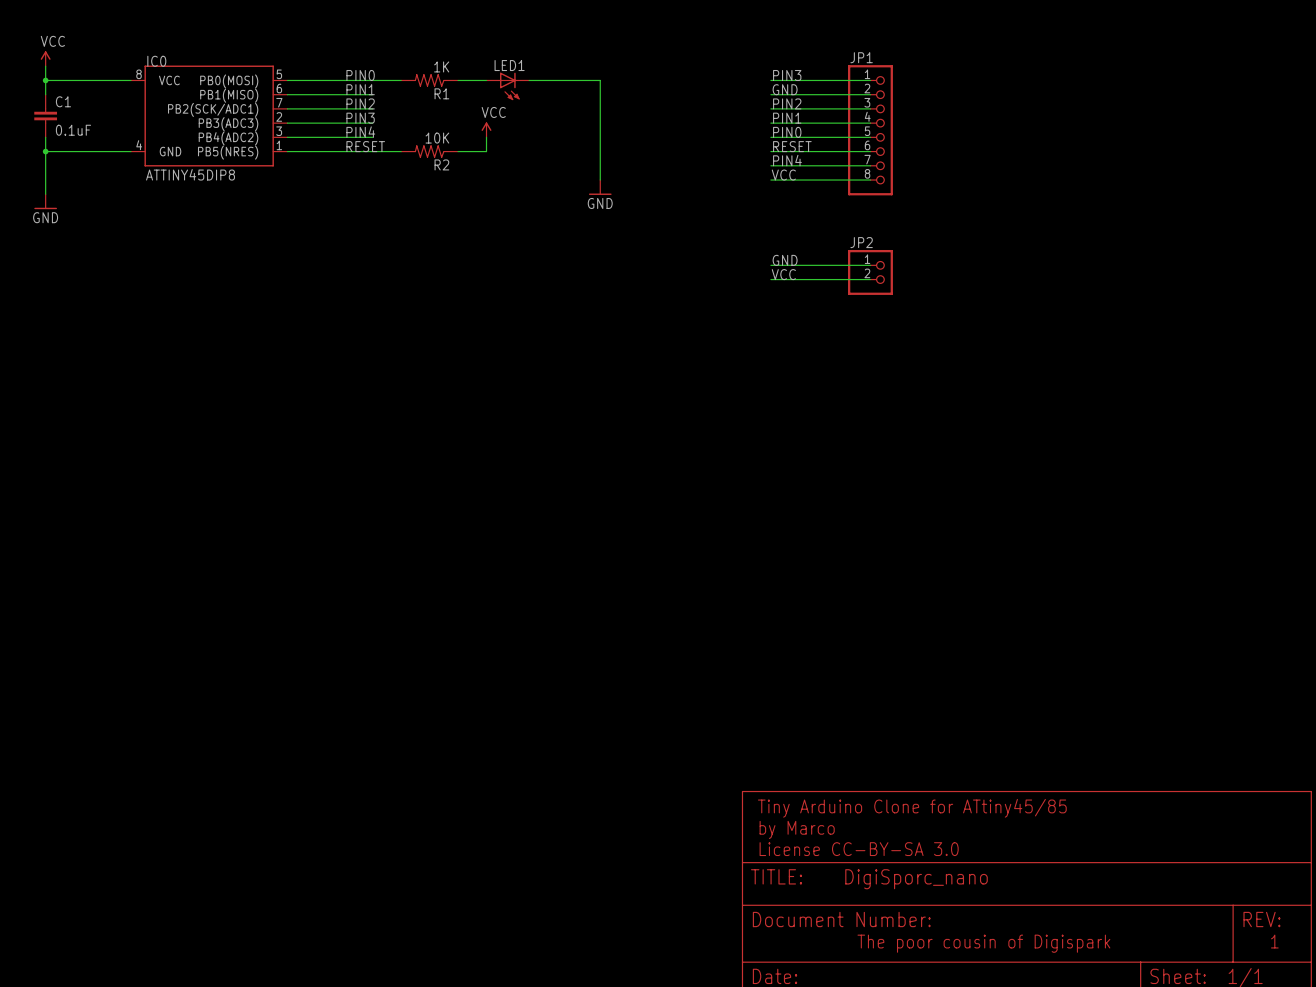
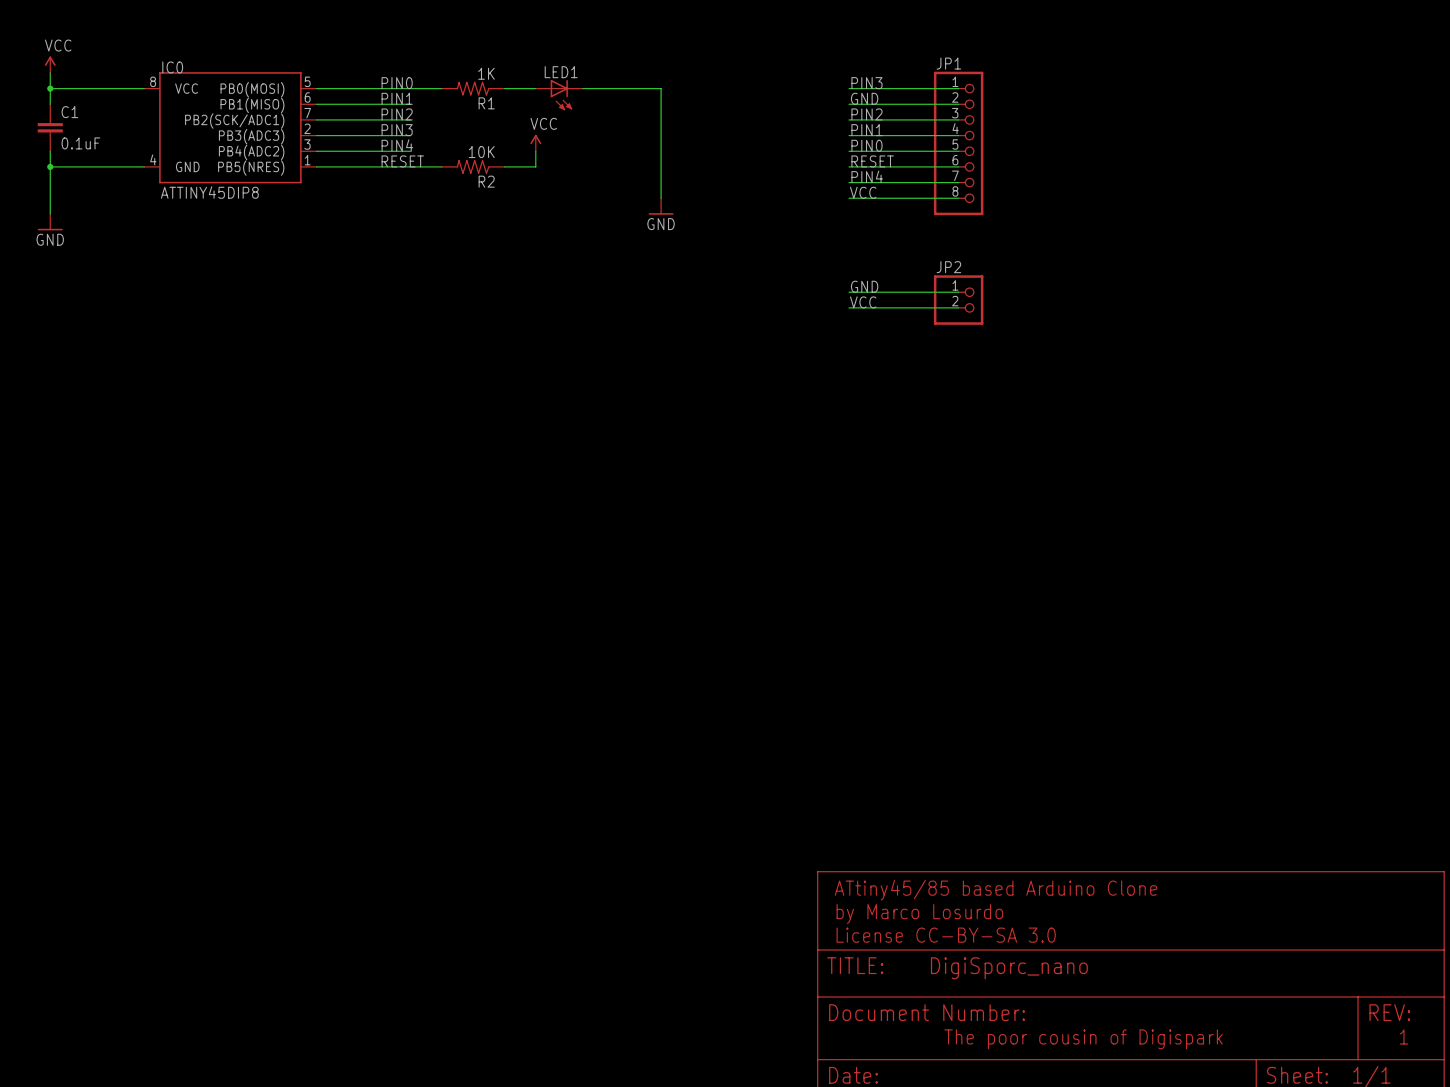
text: Tiny Arduino Clone for ATtiny45/85 (912, 808) -> ATtiny45/85 based Arduino Clone (996, 890)
text: by Marco (797, 829) -> by Marco Losurdo (919, 913)

